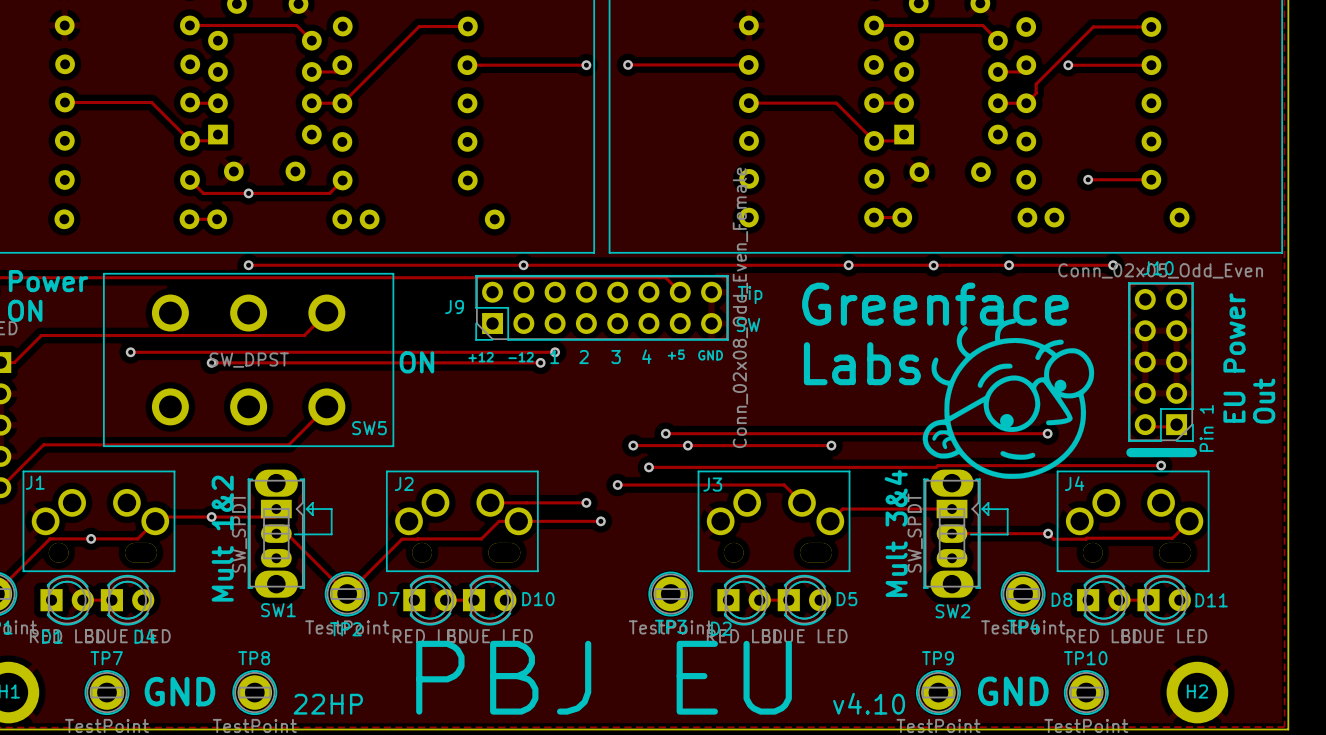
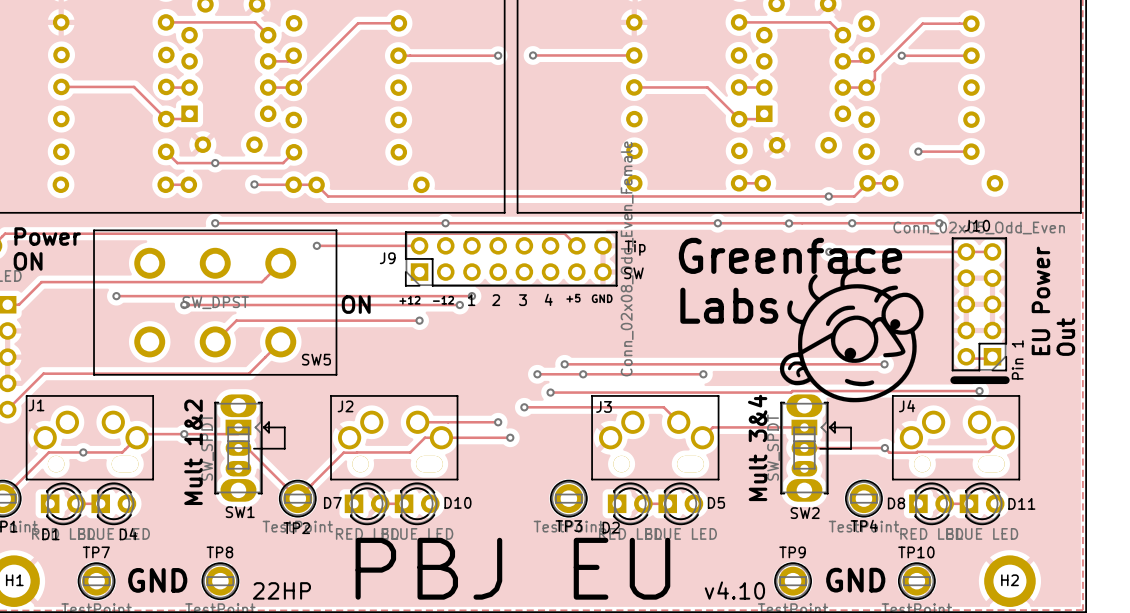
track: none -> (890, 183) (867, 183) (854, 196) (328, 196) (316, 184) (254, 184)
via: none -> (254, 184)
via: none -> (828, 196)
track: none -> (316, 245) (419, 245)
via: none -> (316, 245)
track: none -> (829, 251) (992, 251)
via: none -> (829, 251)
track: none -> (419, 320) (236, 320) (215, 341)
via: none -> (419, 320)

